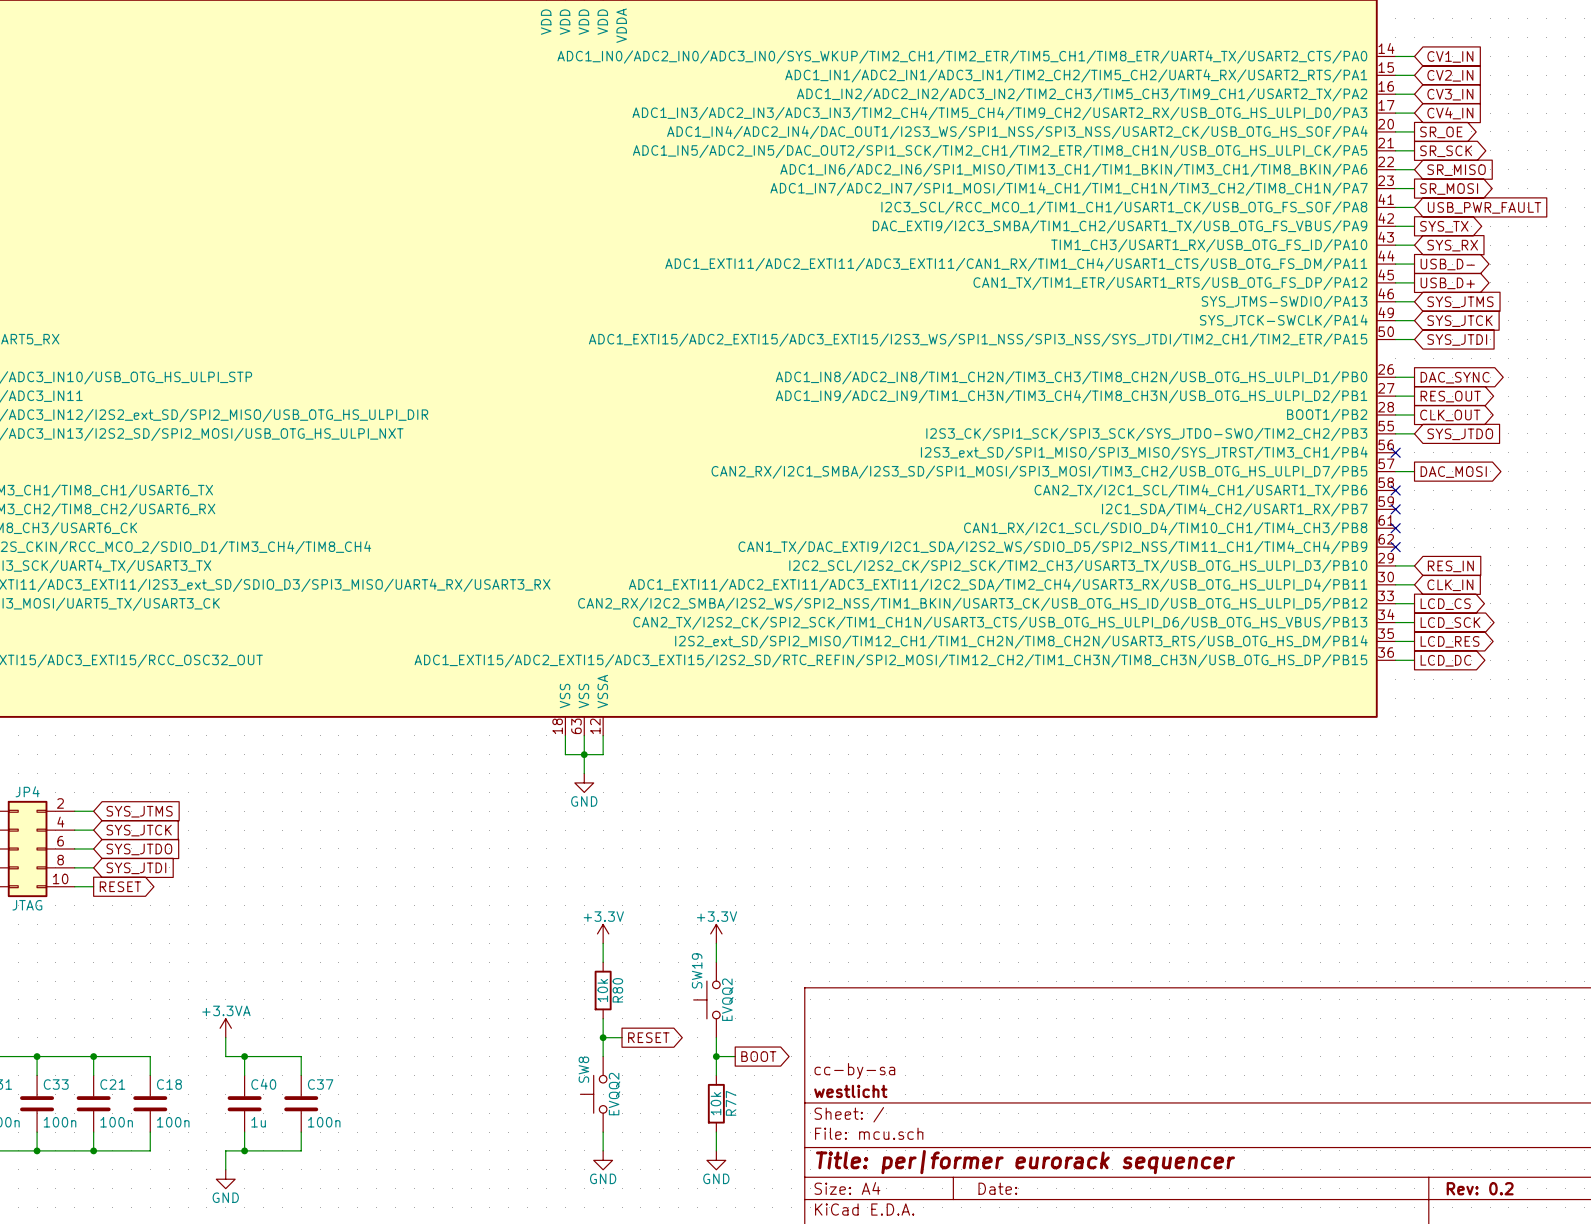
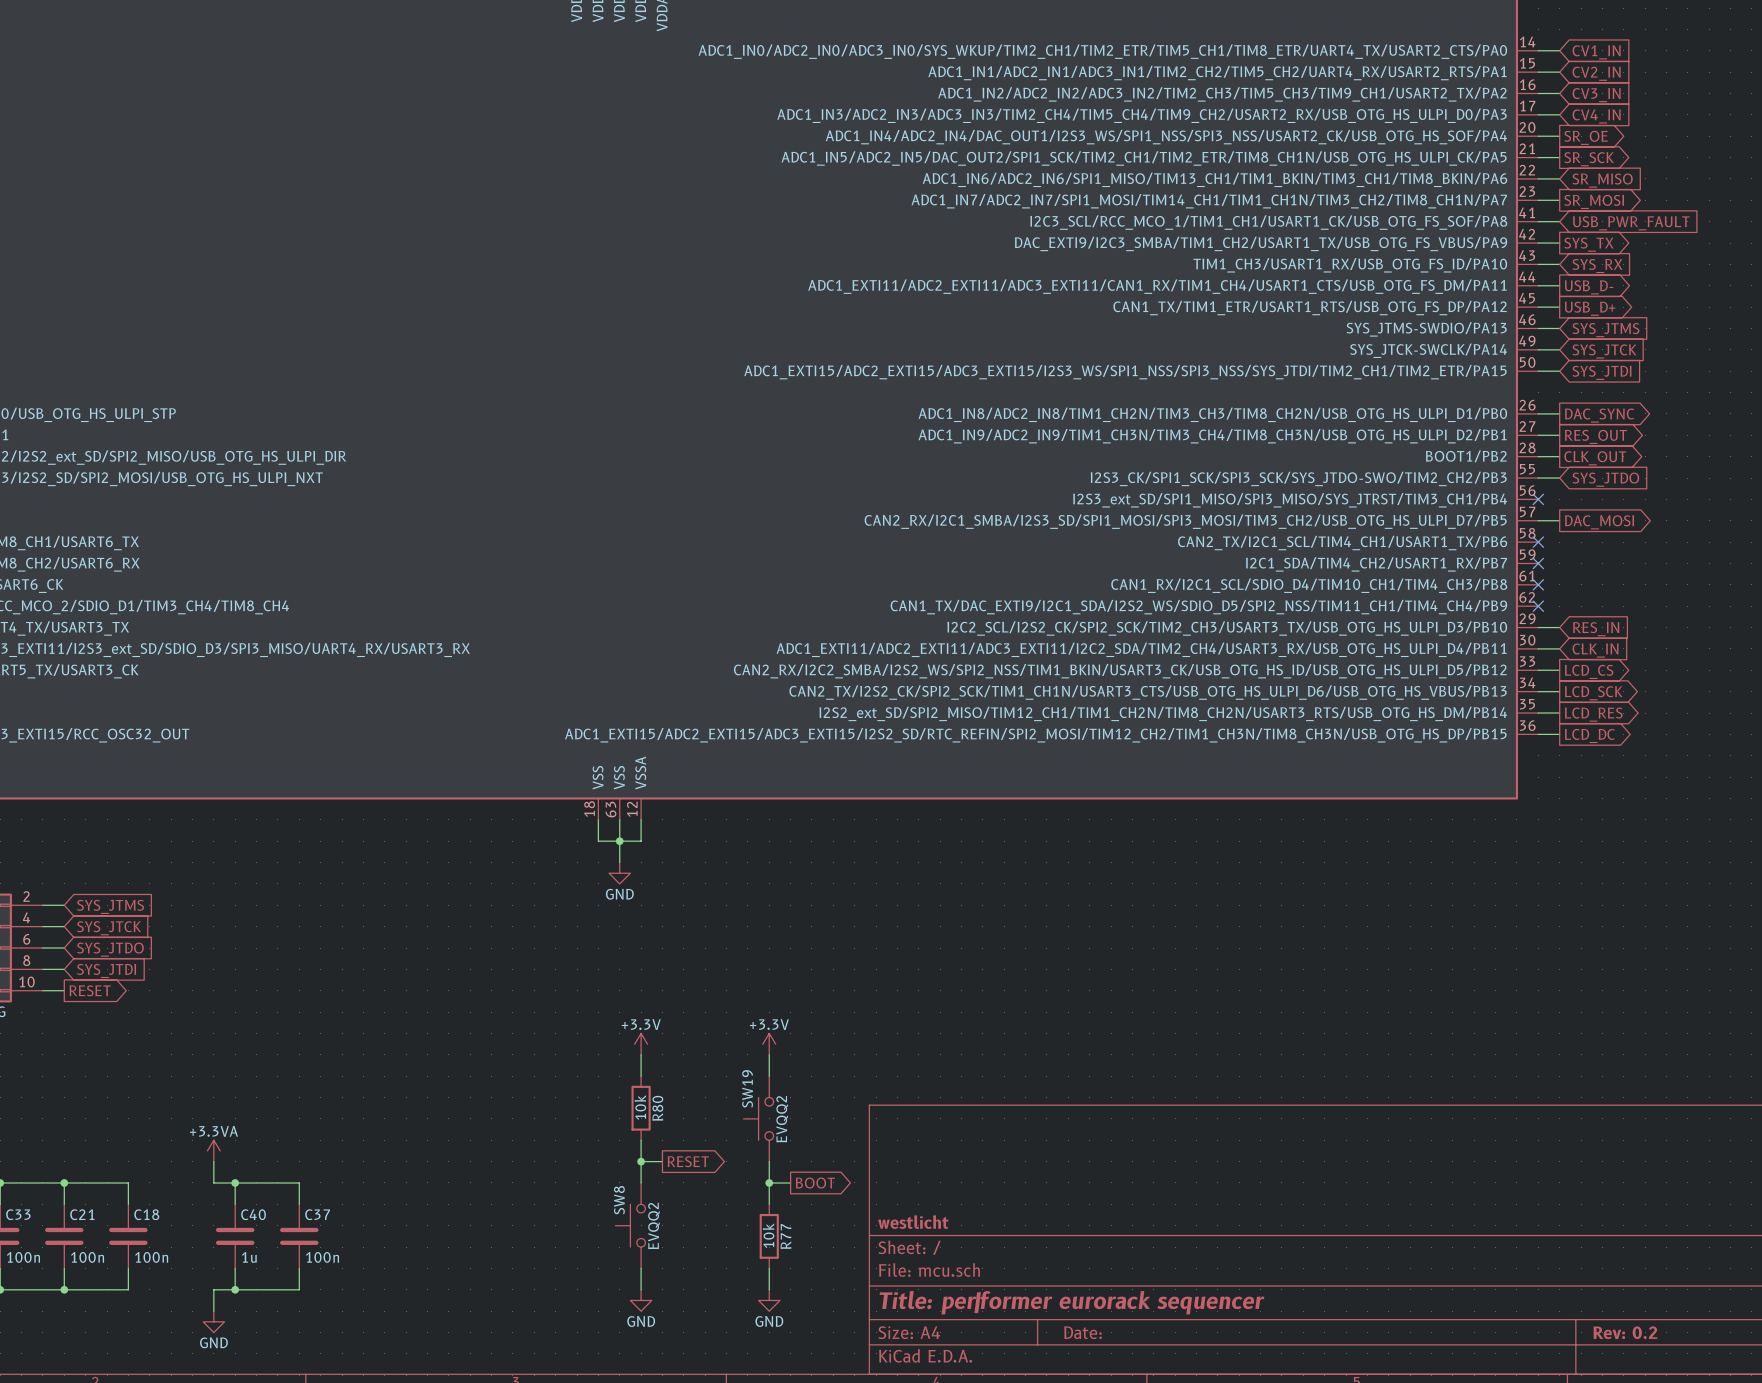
title block: cc-by-sa (854, 1070) -> none

